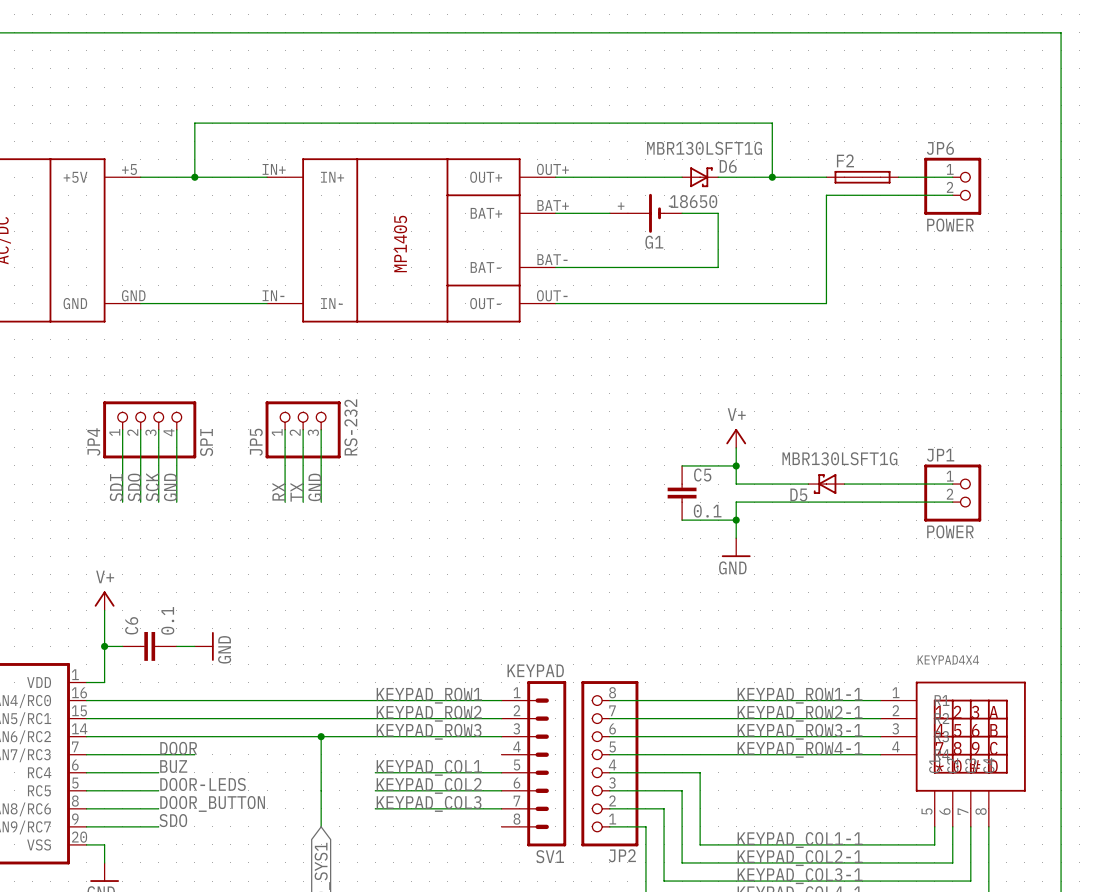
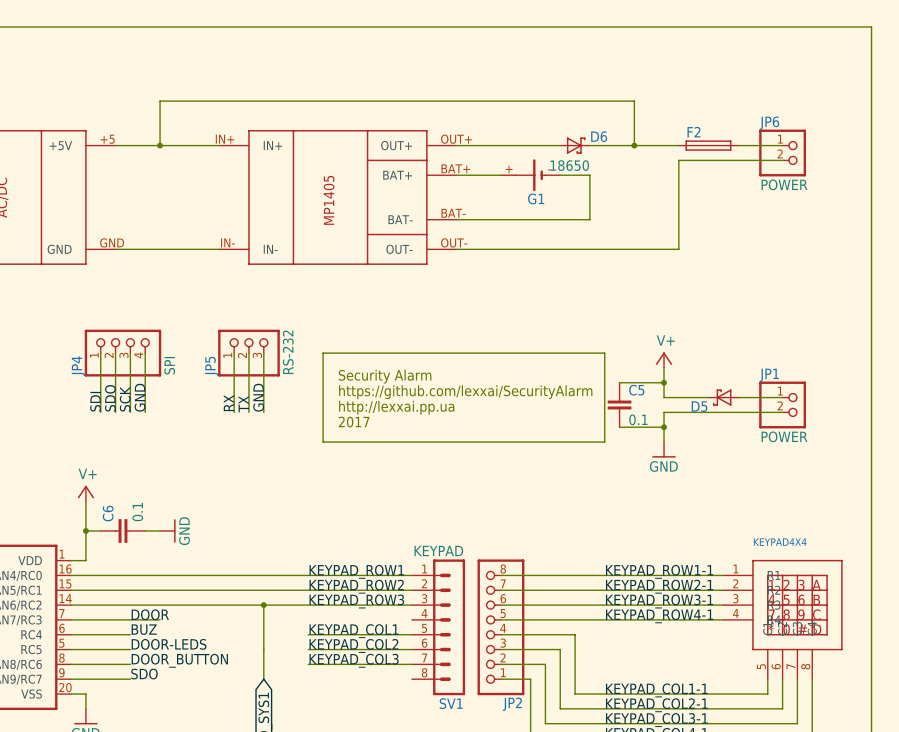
D6 value: MBR130LSFT1G (704, 148) -> none
power symbol position: V+ (736, 438) -> V+ (664, 360)
wire: none -> (604, 367) (604, 353) (323, 353) (323, 442) (604, 442)
wire: none -> (664, 367) (664, 397) (693, 397)
text: none -> Security Alarm (385, 376)
D5 value: MBR130LSFT1G (839, 458) -> none
wire: (682, 465) (736, 465) -> (619, 382) (664, 382)
junction: (736, 465) -> none
junction: none -> (664, 382)
text: none -> https://github.com/lexxai/SecurityAlarm (465, 392)
wire: (736, 484) (808, 484) -> (604, 397) (604, 412)
D5 position: (826, 484) -> (723, 397)
C5 position: (682, 493) -> (619, 404)
text: none -> http://lexxai.pp.ua (396, 407)
wire: (736, 502) (808, 502) -> (664, 442) (664, 412)
text: none -> 2017 (354, 422)
wire: (682, 520) (736, 520) -> (619, 427) (664, 427)
junction: (736, 520) -> none
junction: none -> (664, 427)
power symbol position: GND (736, 547) -> GND (664, 449)

